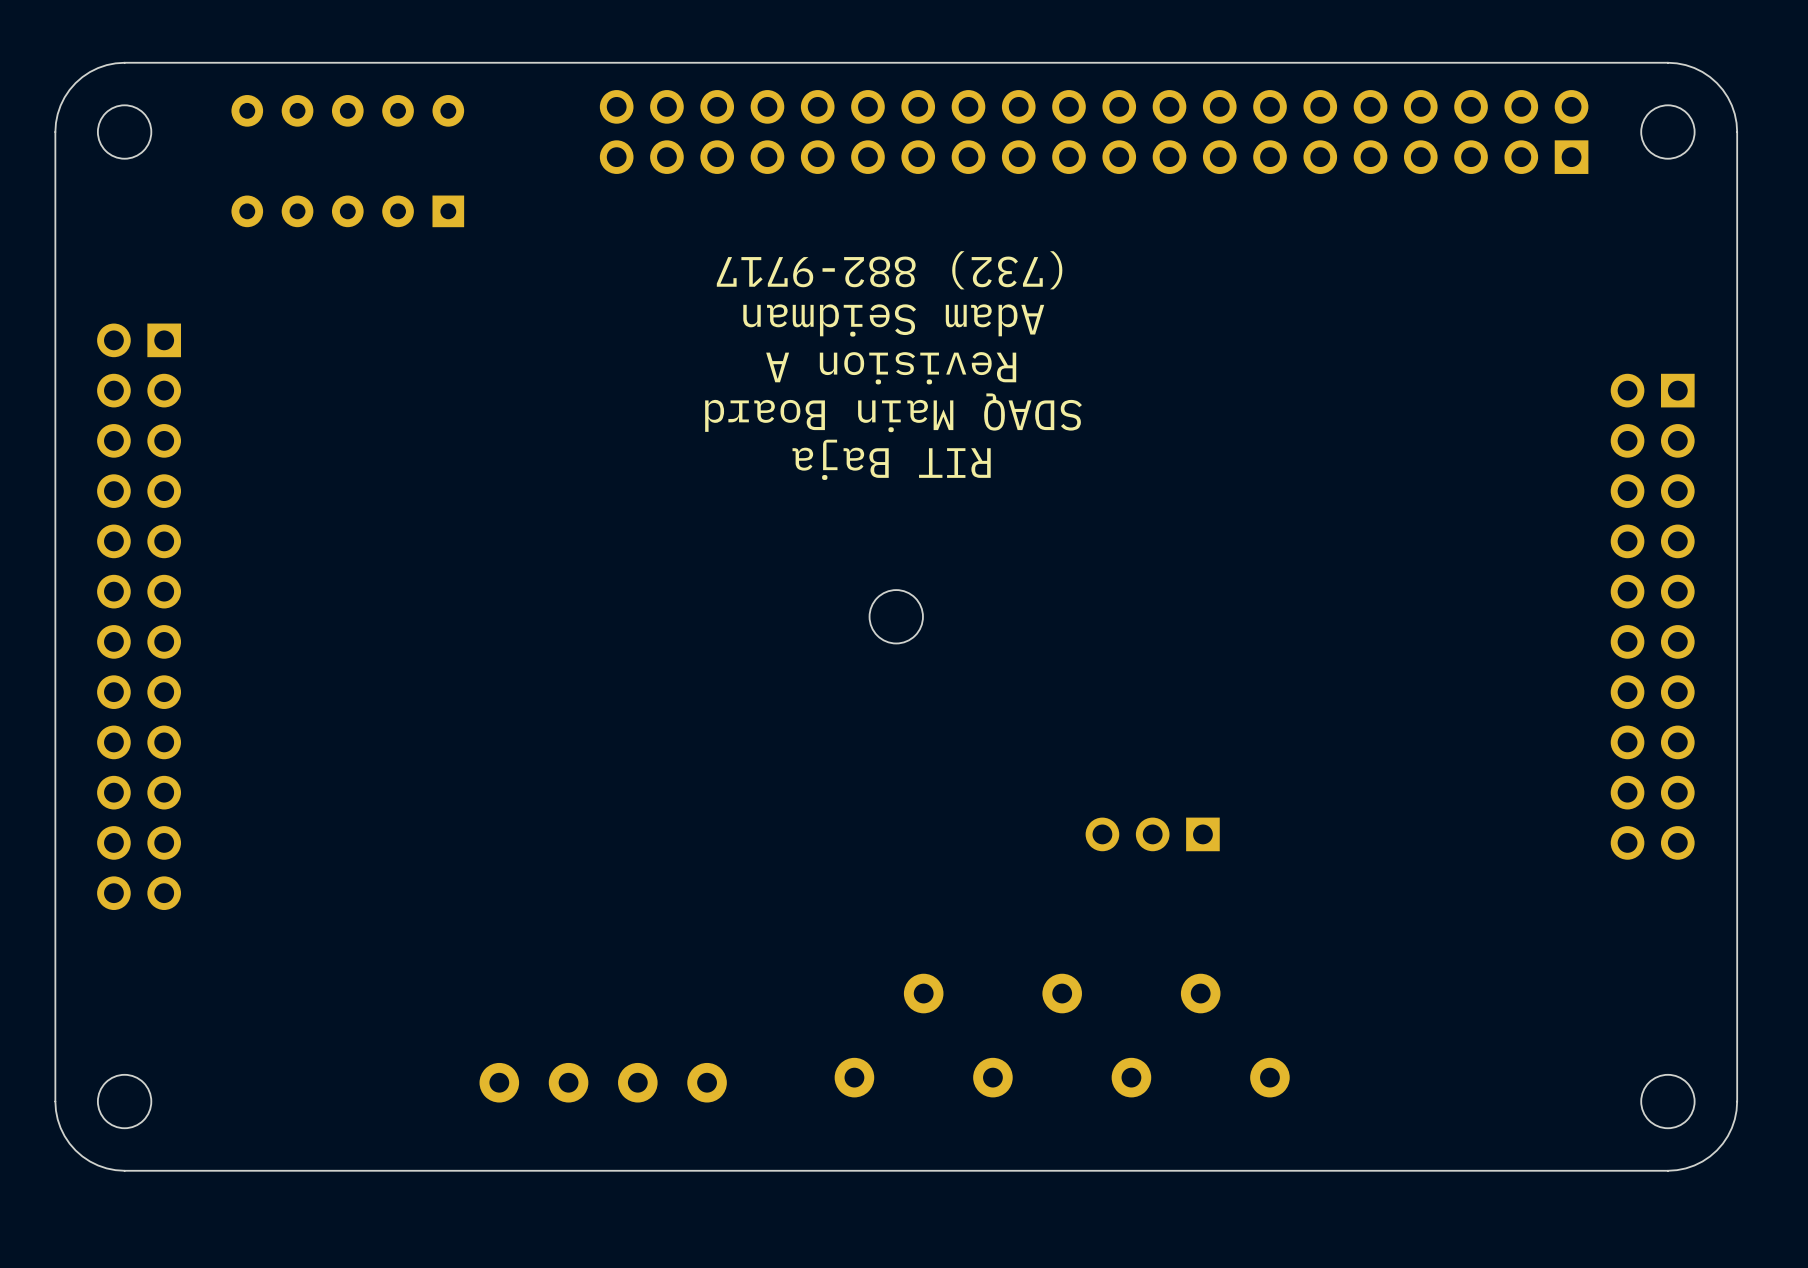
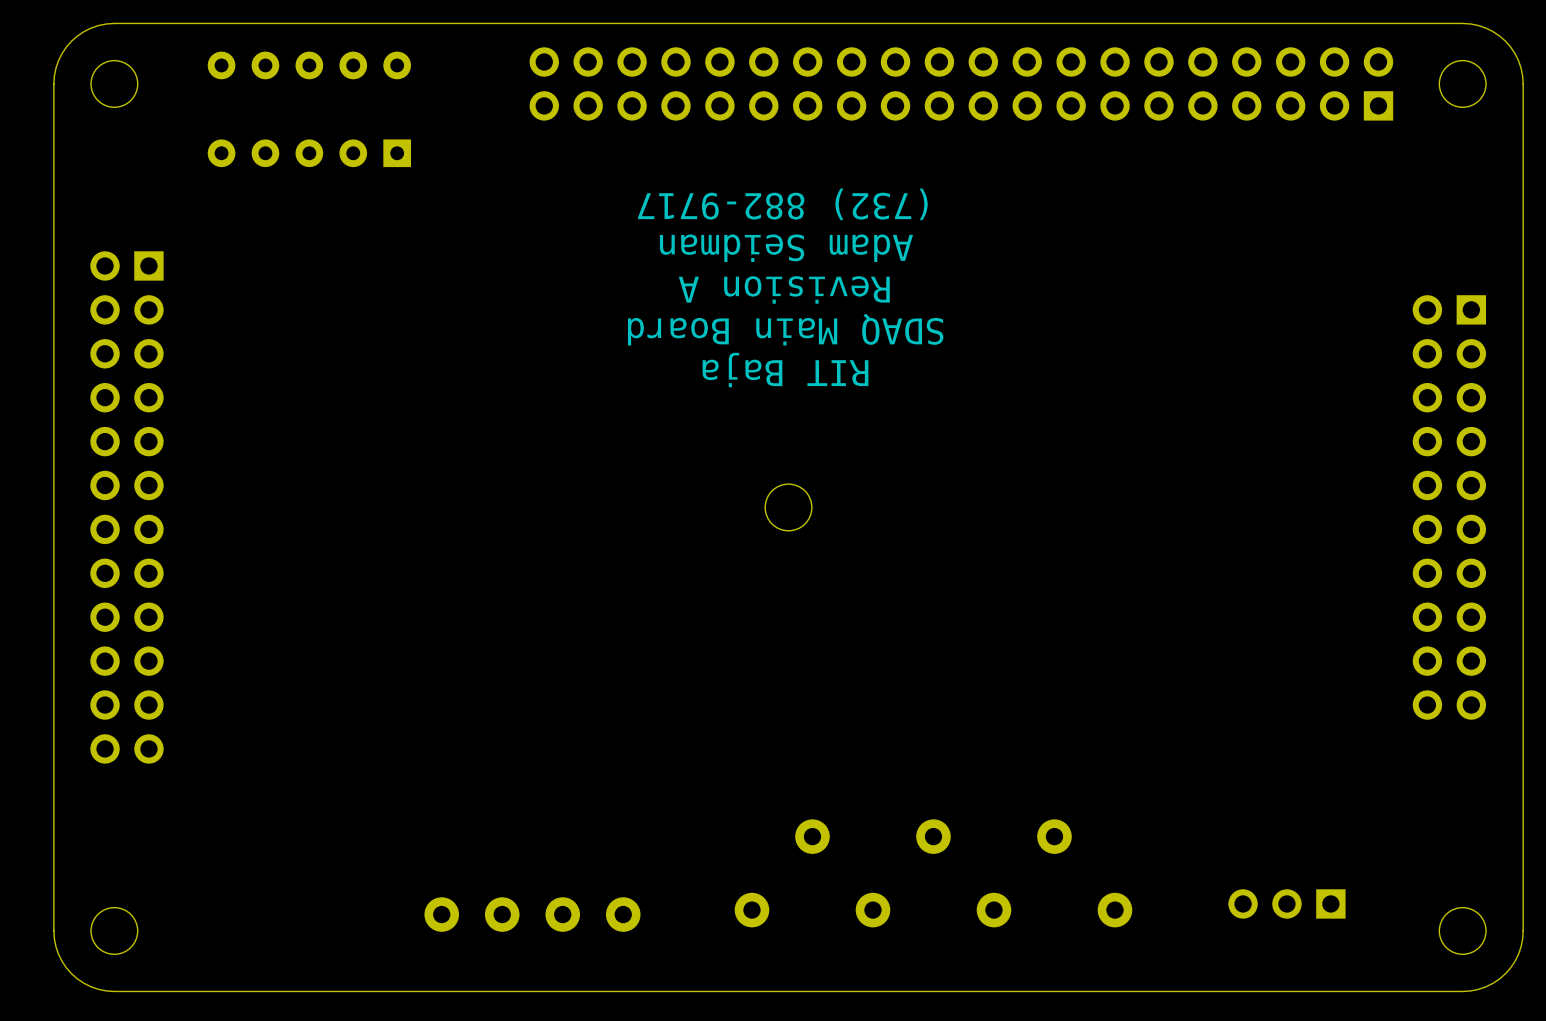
part position: (1152, 834) -> (1286, 903)

